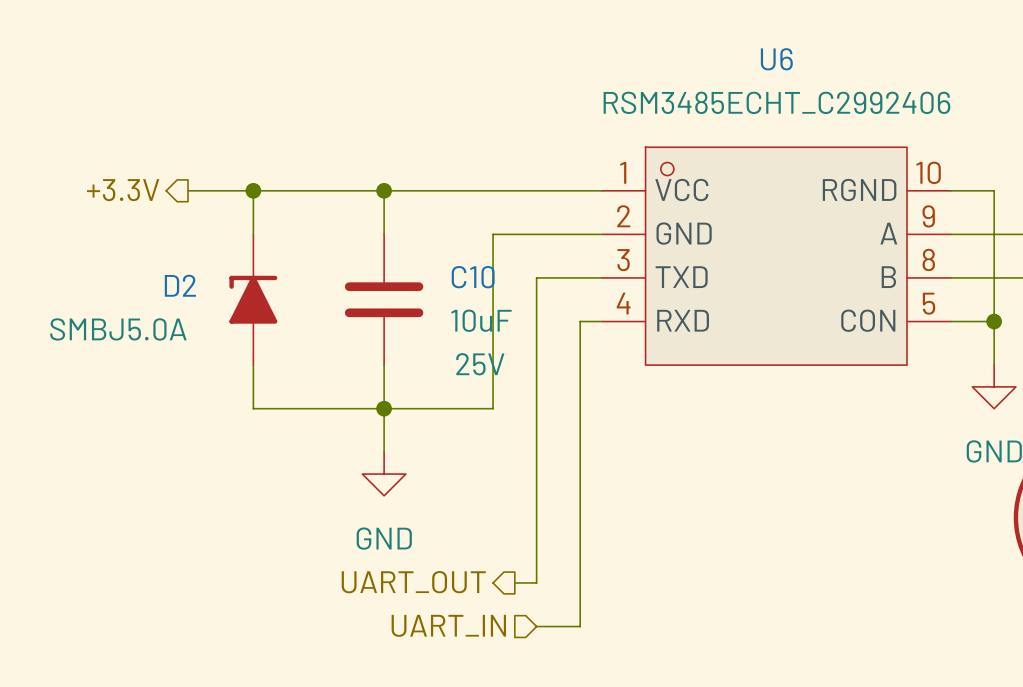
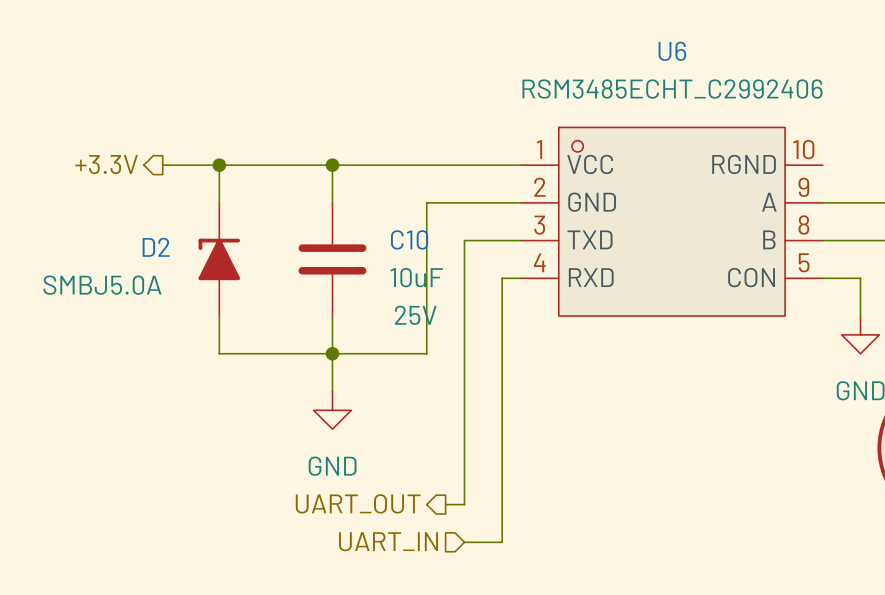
wire: (950, 190) (994, 190) (994, 321) -> none
junction: (994, 321) -> none

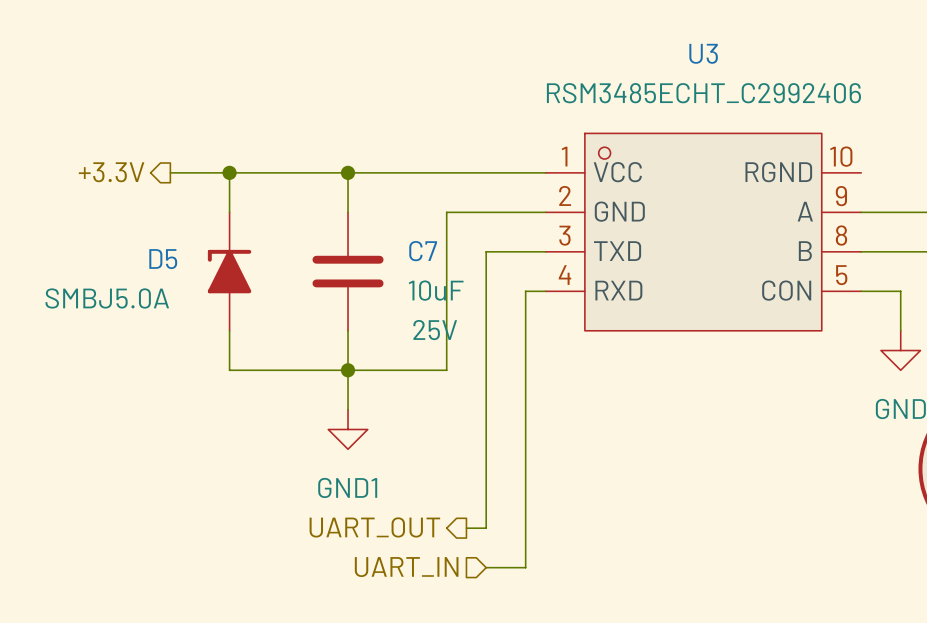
U6 name: U6 (672, 51) -> U3 (703, 53)
C10 name: C10 (409, 239) -> C7 (423, 251)
D2 name: D2 (156, 247) -> D5 (163, 259)
power symbol: GND (332, 410) -> GND1 (348, 429)

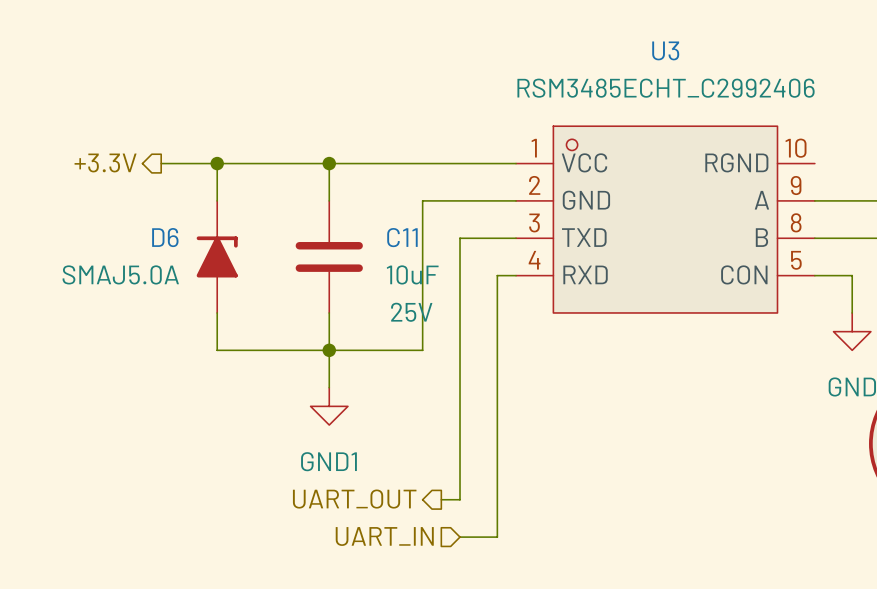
C7 name: C7 (423, 251) -> C11 (402, 237)
D5: SMBJ5.0A (229, 271) -> none
D6: none -> SMAJ5.0A (217, 256)

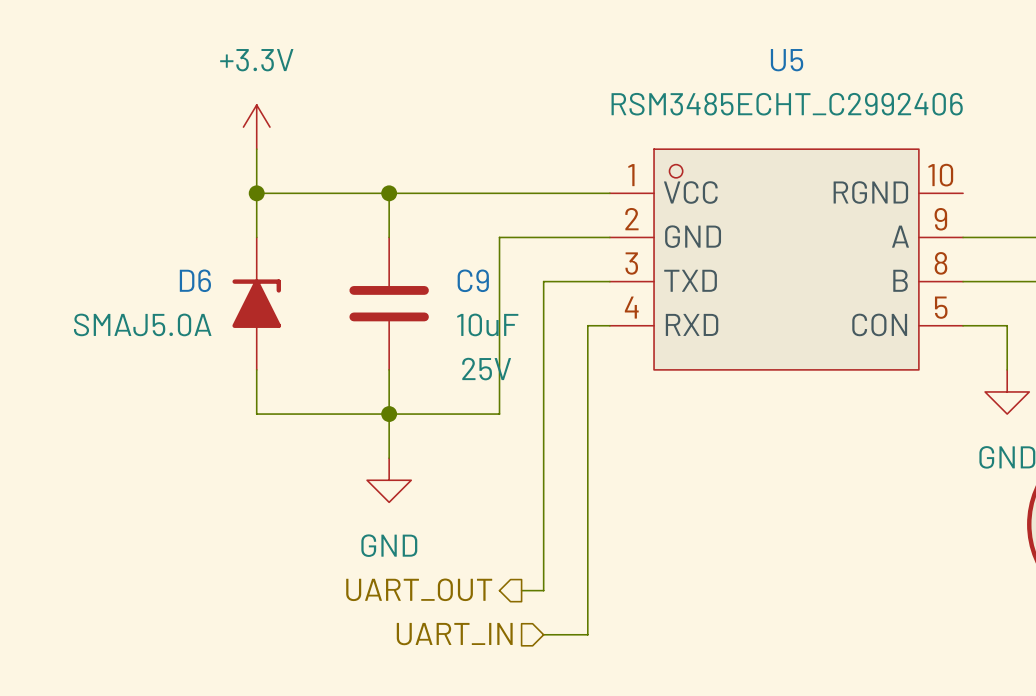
U3 name: U3 (665, 50) -> U5 (787, 60)
power symbol: none -> +3.3V (256, 127)
hierarchical label: +3.3V (105, 162) -> none
wire: (161, 163) (217, 163) -> (256, 149) (256, 193)
C11 name: C11 (402, 237) -> C9 (473, 280)
power symbol: GND1 (329, 406) -> GND (389, 480)

